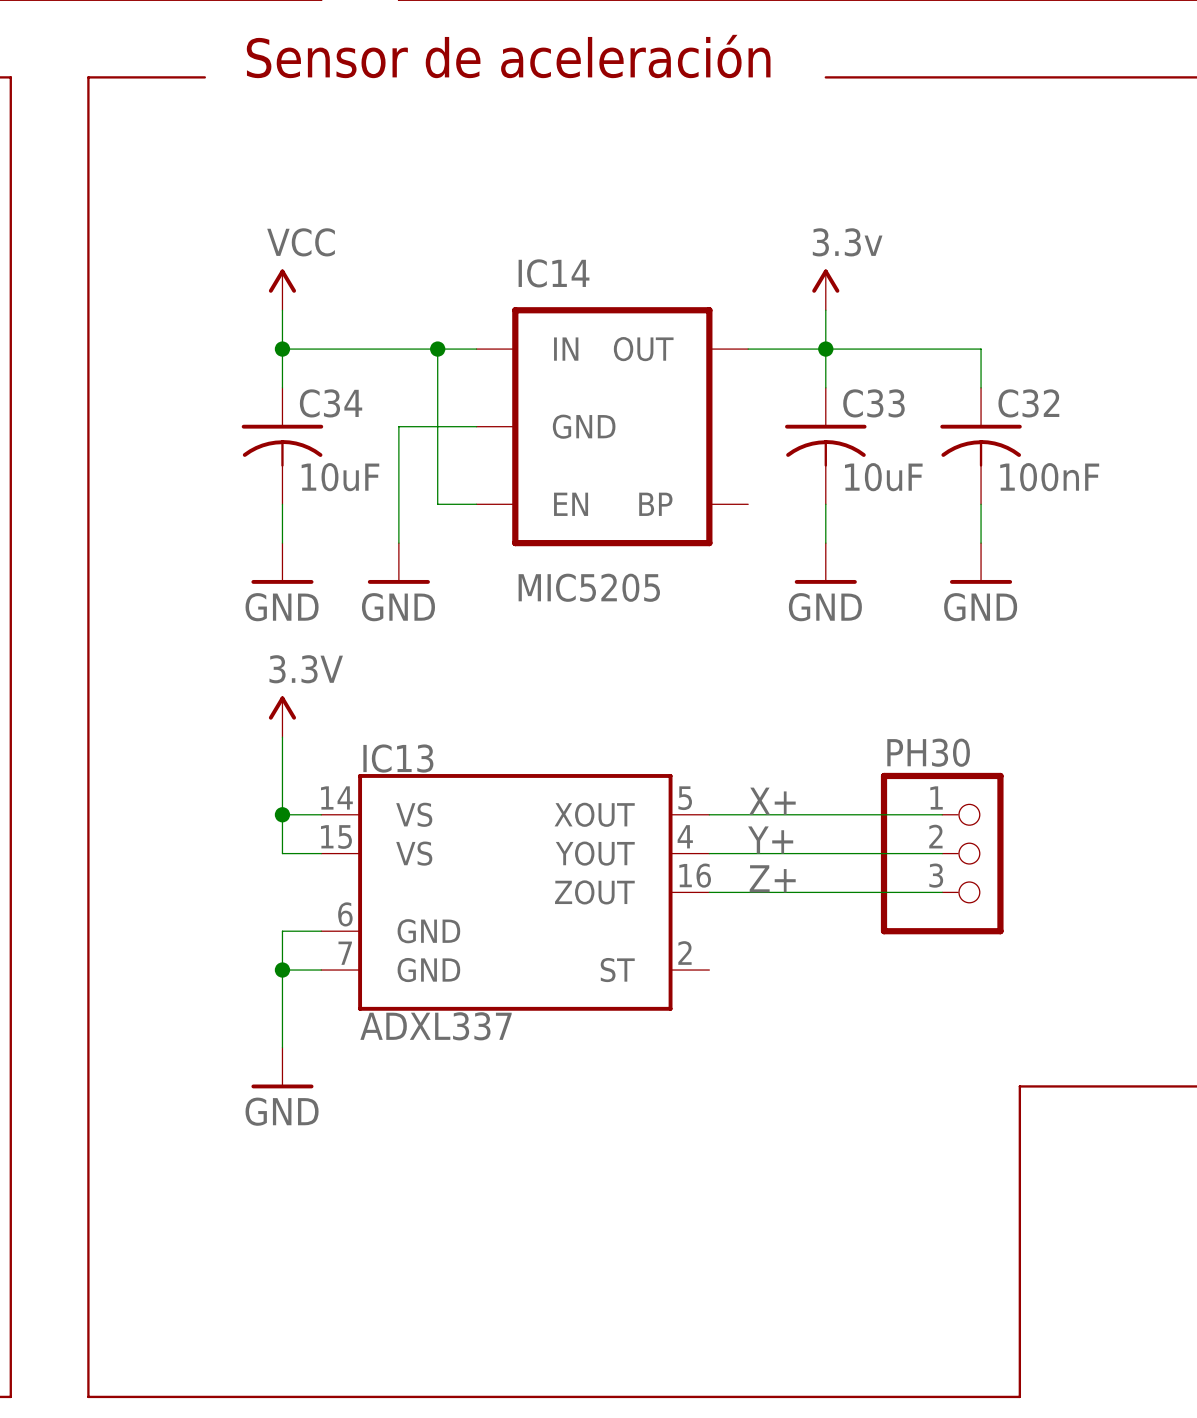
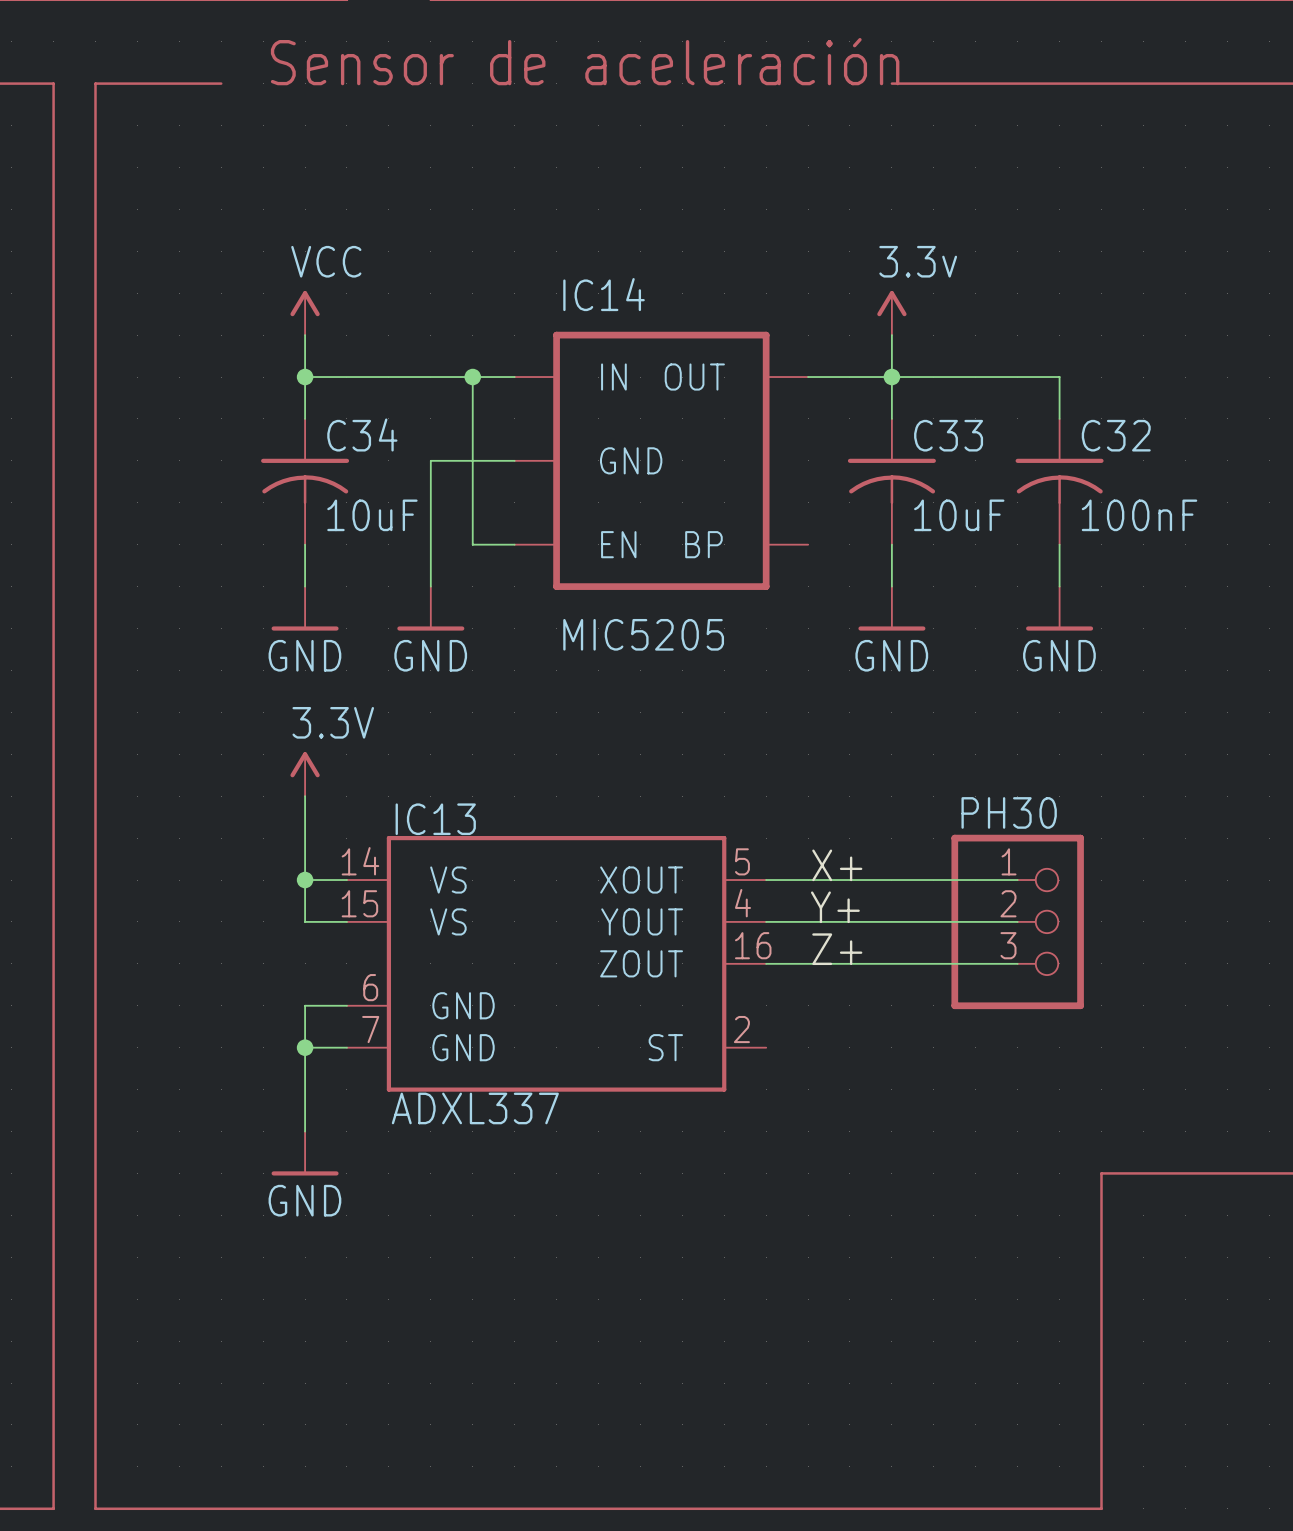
line: (10, 77) (10, 1396) -> (11, 83) (53, 83) (53, 1508) (11, 1508)

